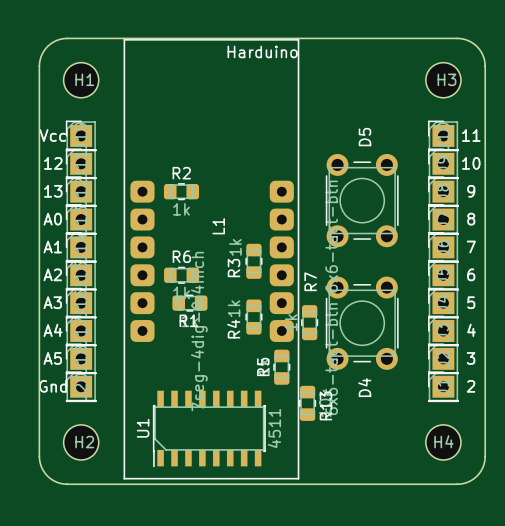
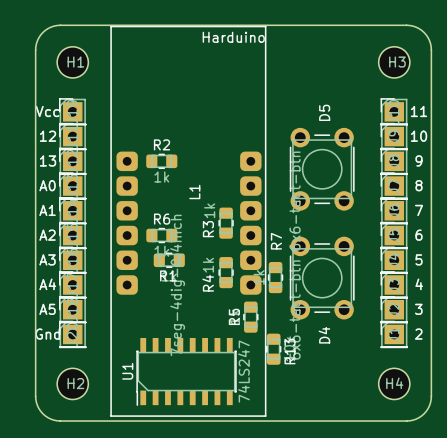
U1 value: 4511 (274, 428) -> 74LS247 (243, 371)

